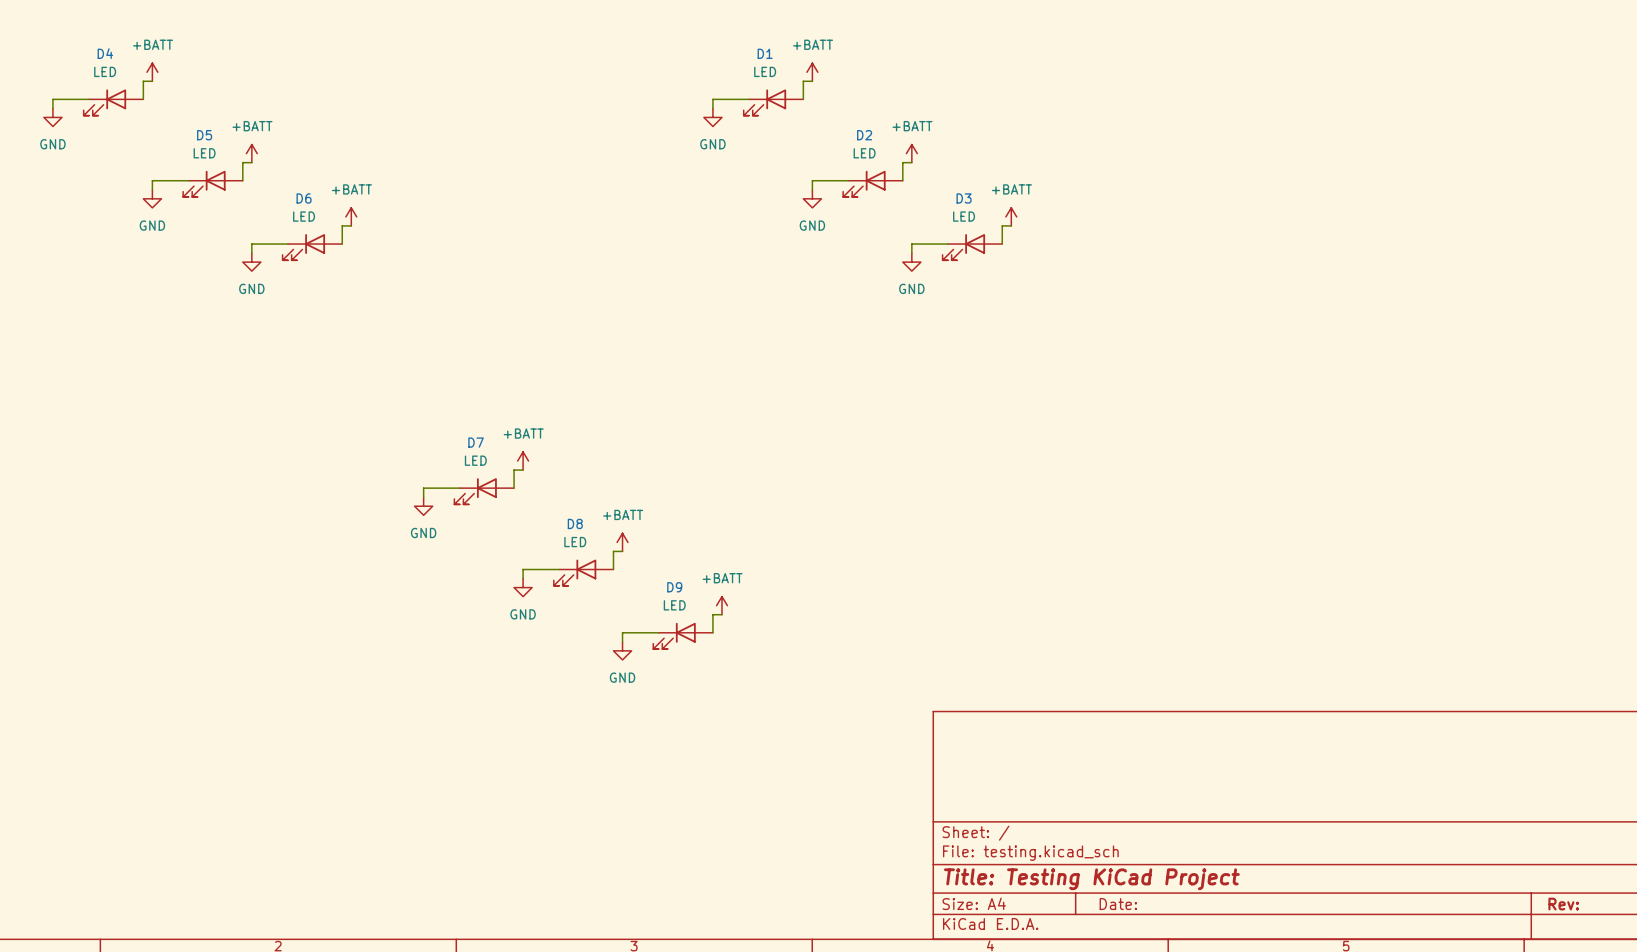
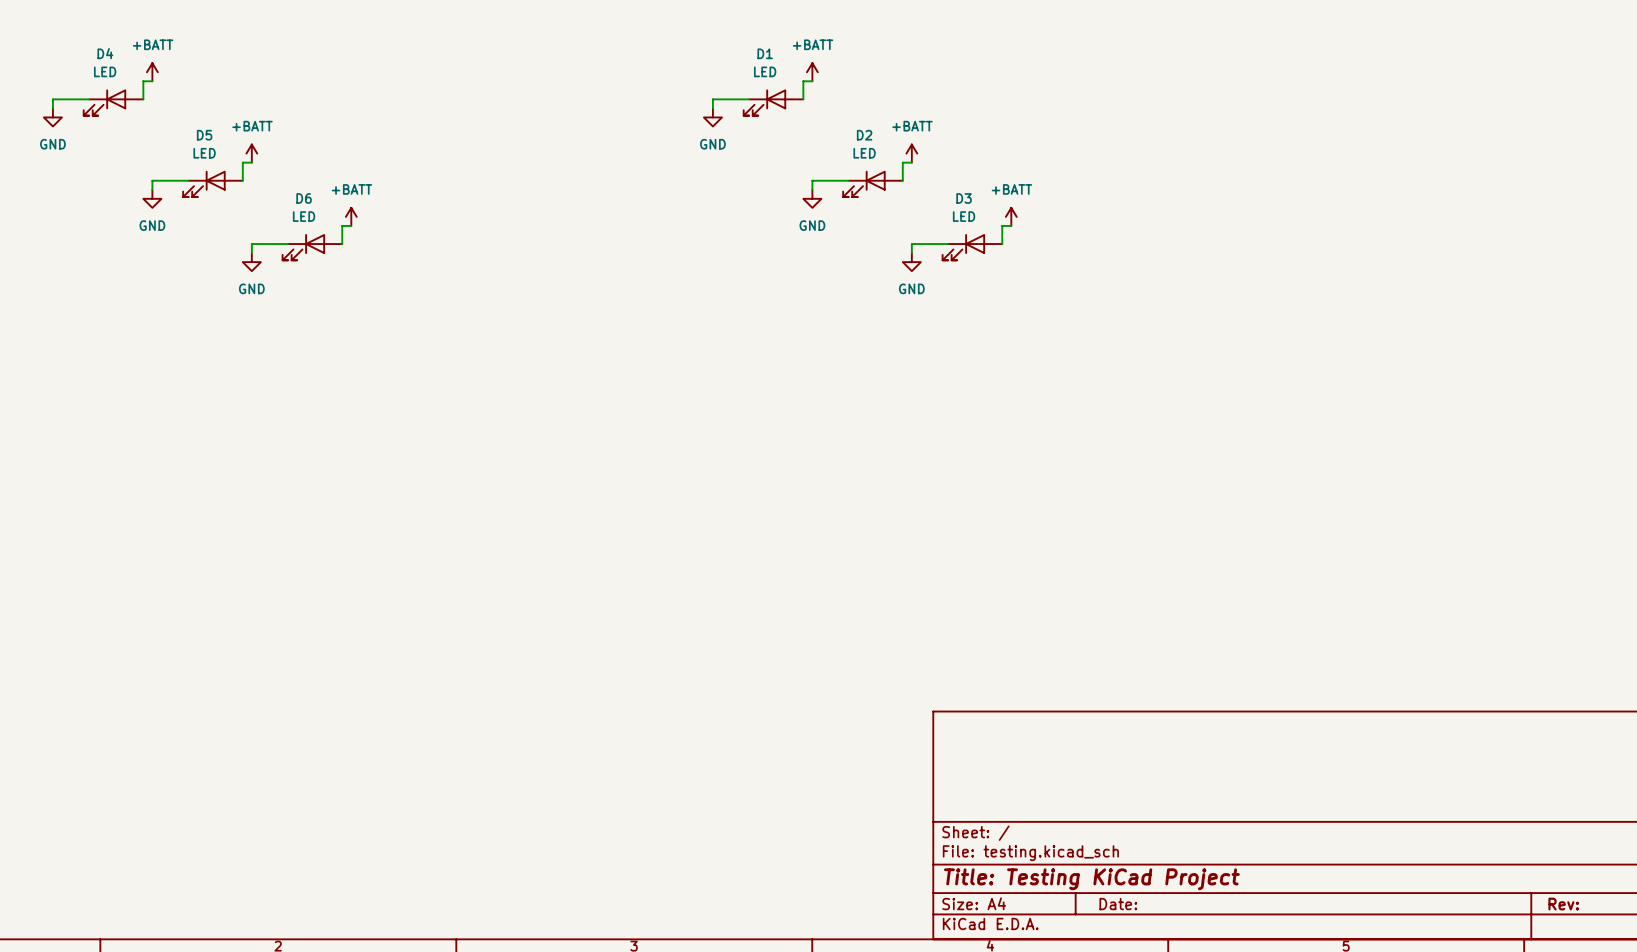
power symbol: +BATT (523, 461) -> none
wire: (523, 470) (514, 470) (514, 488) -> none
wire: (459, 488) (423, 488) (423, 497) -> none
D7: LED (484, 491) -> none
power symbol: GND (423, 506) -> none
power symbol: +BATT (622, 542) -> none
wire: (622, 551) (613, 551) (613, 569) -> none
wire: (559, 569) (523, 569) (523, 578) -> none
D8: LED (583, 572) -> none
power symbol: GND (523, 587) -> none
power symbol: +BATT (721, 605) -> none
wire: (721, 614) (712, 614) (712, 632) -> none
wire: (658, 632) (622, 632) (622, 641) -> none
D9: LED (683, 635) -> none
power symbol: GND (622, 650) -> none

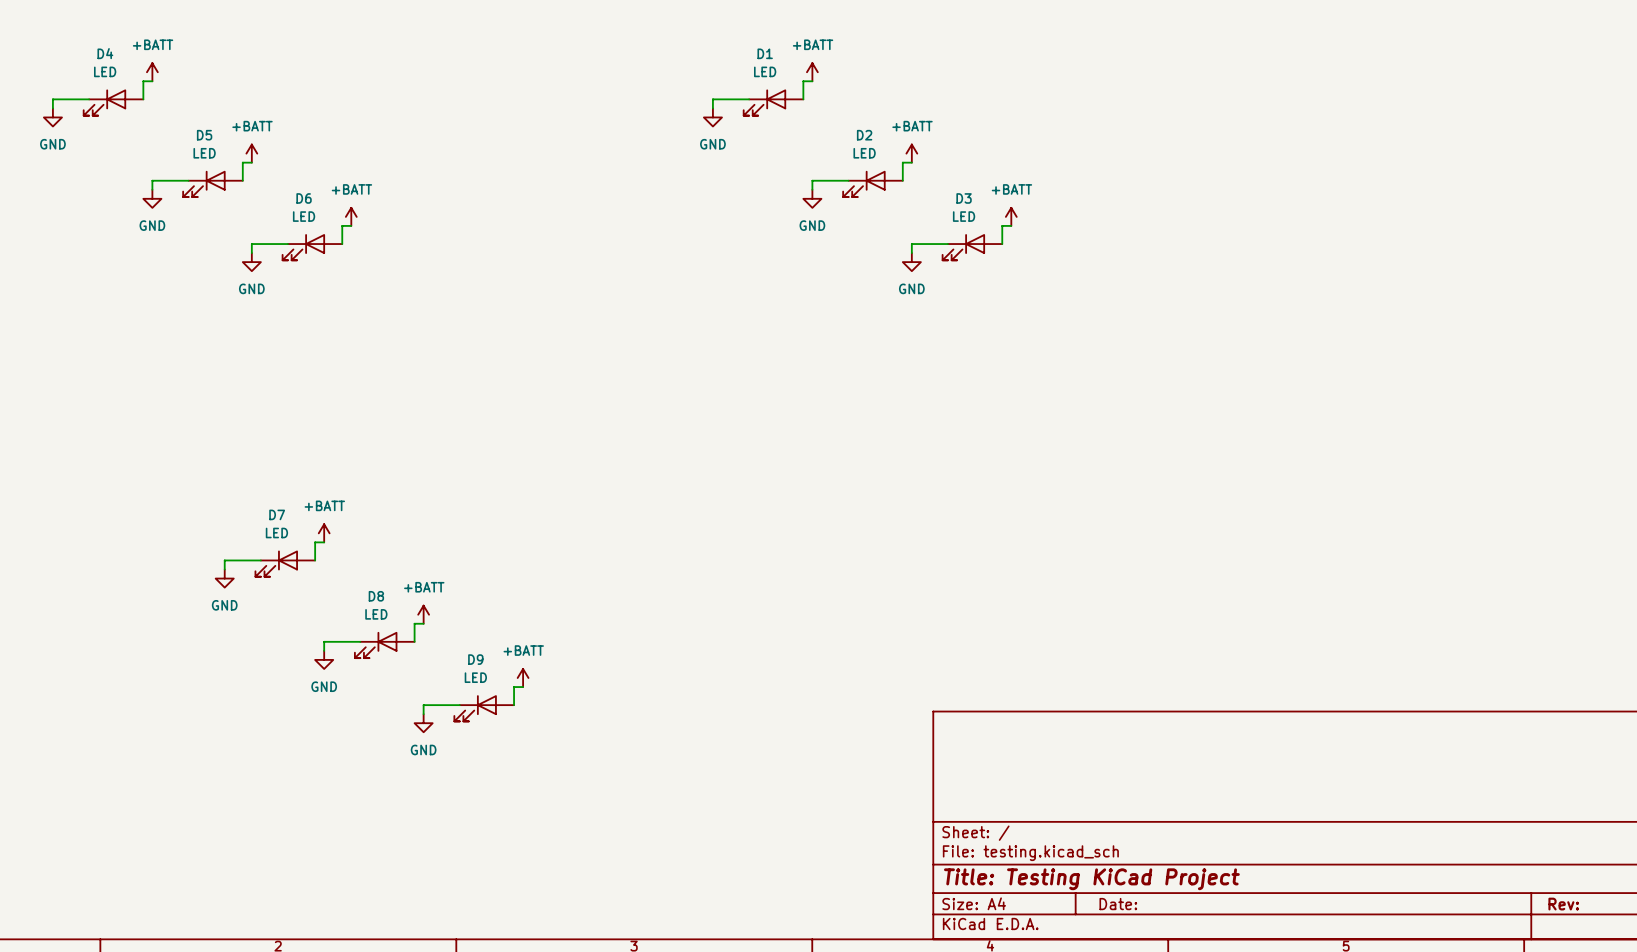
power symbol: none -> +BATT (324, 533)
wire: none -> (324, 542) (315, 542) (315, 560)
wire: none -> (260, 560) (224, 560) (224, 569)
D7: none -> LED (285, 563)
power symbol: none -> GND (224, 578)
power symbol: none -> +BATT (423, 614)
wire: none -> (423, 623) (414, 623) (414, 641)
wire: none -> (360, 641) (324, 641) (324, 650)
D8: none -> LED (384, 645)
power symbol: none -> GND (324, 659)
power symbol: none -> +BATT (523, 678)
wire: none -> (523, 687) (514, 687) (514, 705)
wire: none -> (459, 705) (423, 705) (423, 714)
D9: none -> LED (484, 708)
power symbol: none -> GND (423, 723)

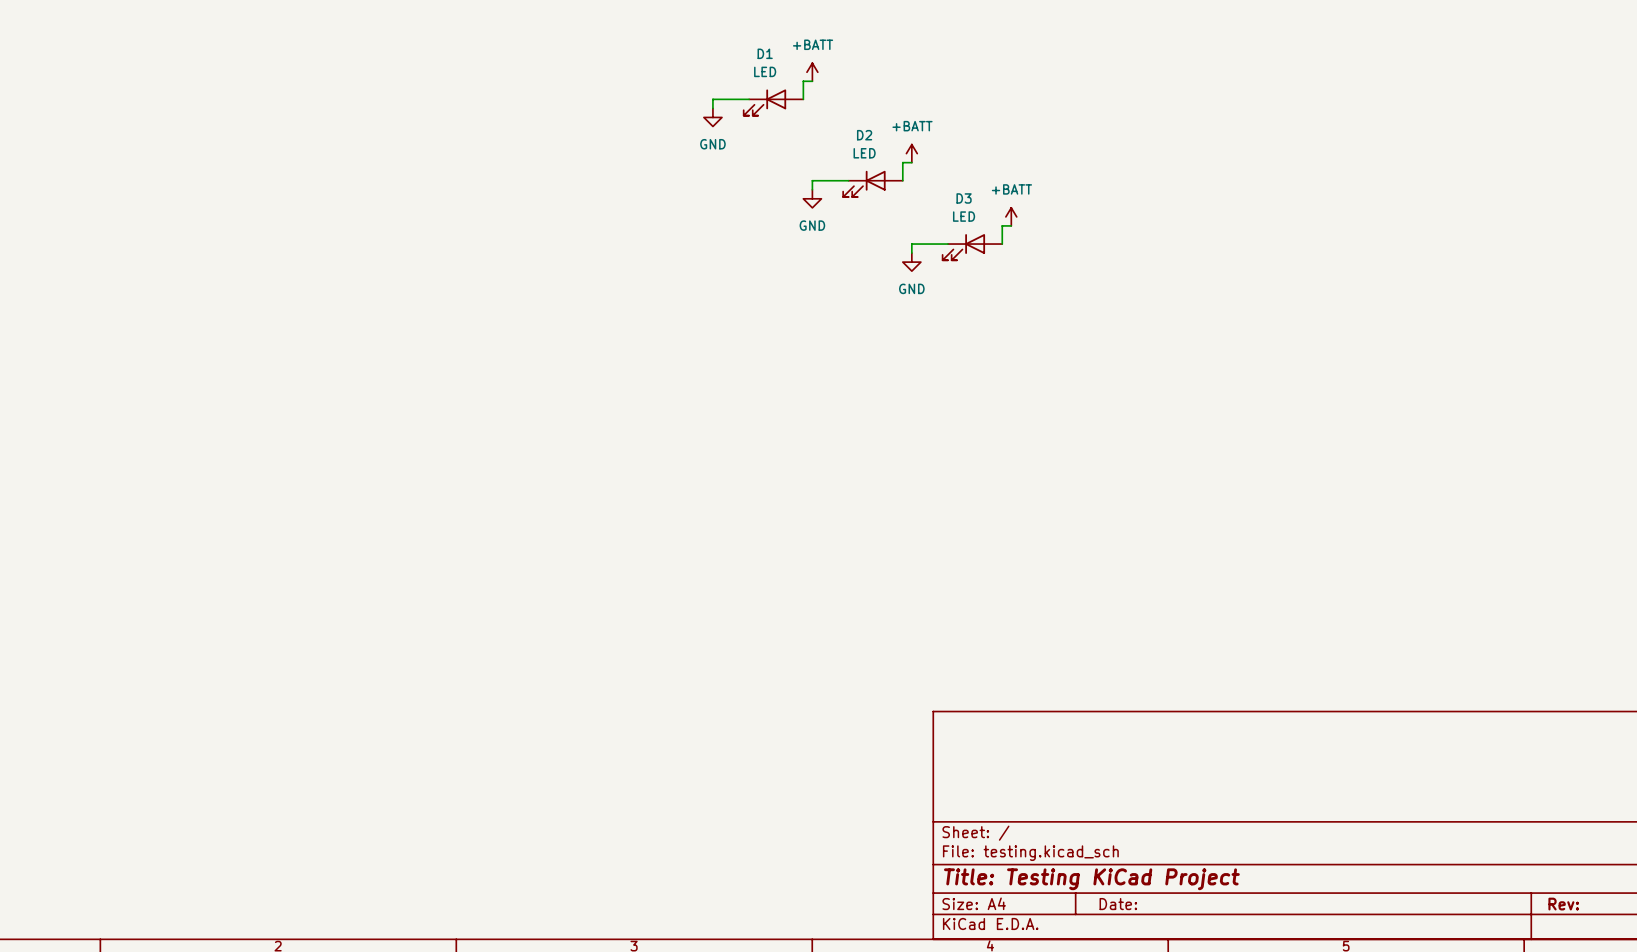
power symbol: +BATT (152, 72) -> none
wire: (152, 81) (143, 81) (143, 99) -> none
wire: (89, 99) (52, 99) (52, 108) -> none
D4: LED (113, 102) -> none
power symbol: GND (52, 117) -> none
power symbol: +BATT (251, 153) -> none
wire: (251, 162) (242, 162) (242, 180) -> none
wire: (188, 180) (152, 180) (152, 189) -> none
D5: LED (212, 183) -> none
power symbol: GND (152, 198) -> none
power symbol: +BATT (351, 216) -> none
wire: (351, 225) (342, 225) (342, 244) -> none
wire: (288, 244) (251, 244) (251, 253) -> none
D6: LED (312, 247) -> none
power symbol: GND (251, 262) -> none
power symbol: +BATT (324, 533) -> none
wire: (324, 542) (315, 542) (315, 560) -> none
wire: (260, 560) (224, 560) (224, 569) -> none
D7: LED (285, 563) -> none
power symbol: GND (224, 578) -> none
power symbol: +BATT (423, 614) -> none
wire: (423, 623) (414, 623) (414, 641) -> none
wire: (360, 641) (324, 641) (324, 650) -> none
D8: LED (384, 645) -> none
power symbol: GND (324, 659) -> none
power symbol: +BATT (523, 678) -> none
wire: (523, 687) (514, 687) (514, 705) -> none
wire: (459, 705) (423, 705) (423, 714) -> none
D9: LED (484, 708) -> none
power symbol: GND (423, 723) -> none

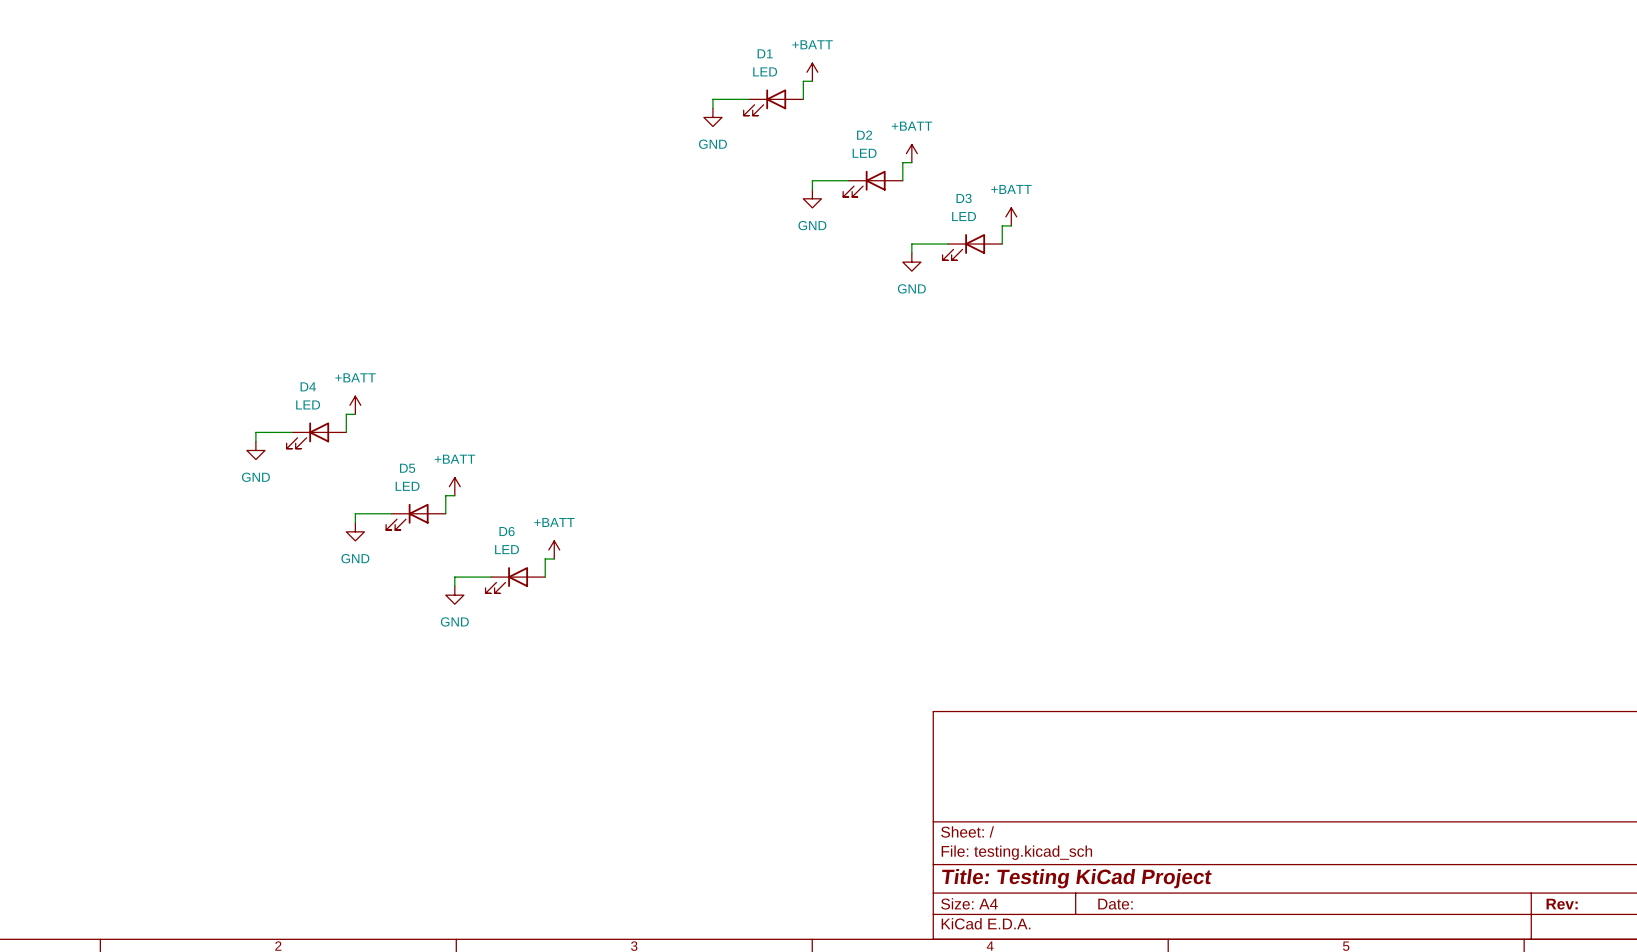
power symbol: none -> +BATT (355, 405)
wire: none -> (355, 414) (346, 414) (346, 432)
wire: none -> (292, 432) (255, 432) (255, 441)
D4: none -> LED (316, 435)
power symbol: none -> GND (255, 450)
power symbol: none -> +BATT (454, 486)
wire: none -> (454, 495) (445, 495) (445, 513)
wire: none -> (391, 513) (355, 513) (355, 522)
D5: none -> LED (415, 516)
power symbol: none -> GND (355, 531)
power symbol: none -> +BATT (554, 549)
wire: none -> (554, 558) (545, 558) (545, 577)
wire: none -> (490, 577) (454, 577) (454, 586)
D6: none -> LED (515, 580)
power symbol: none -> GND (454, 595)

